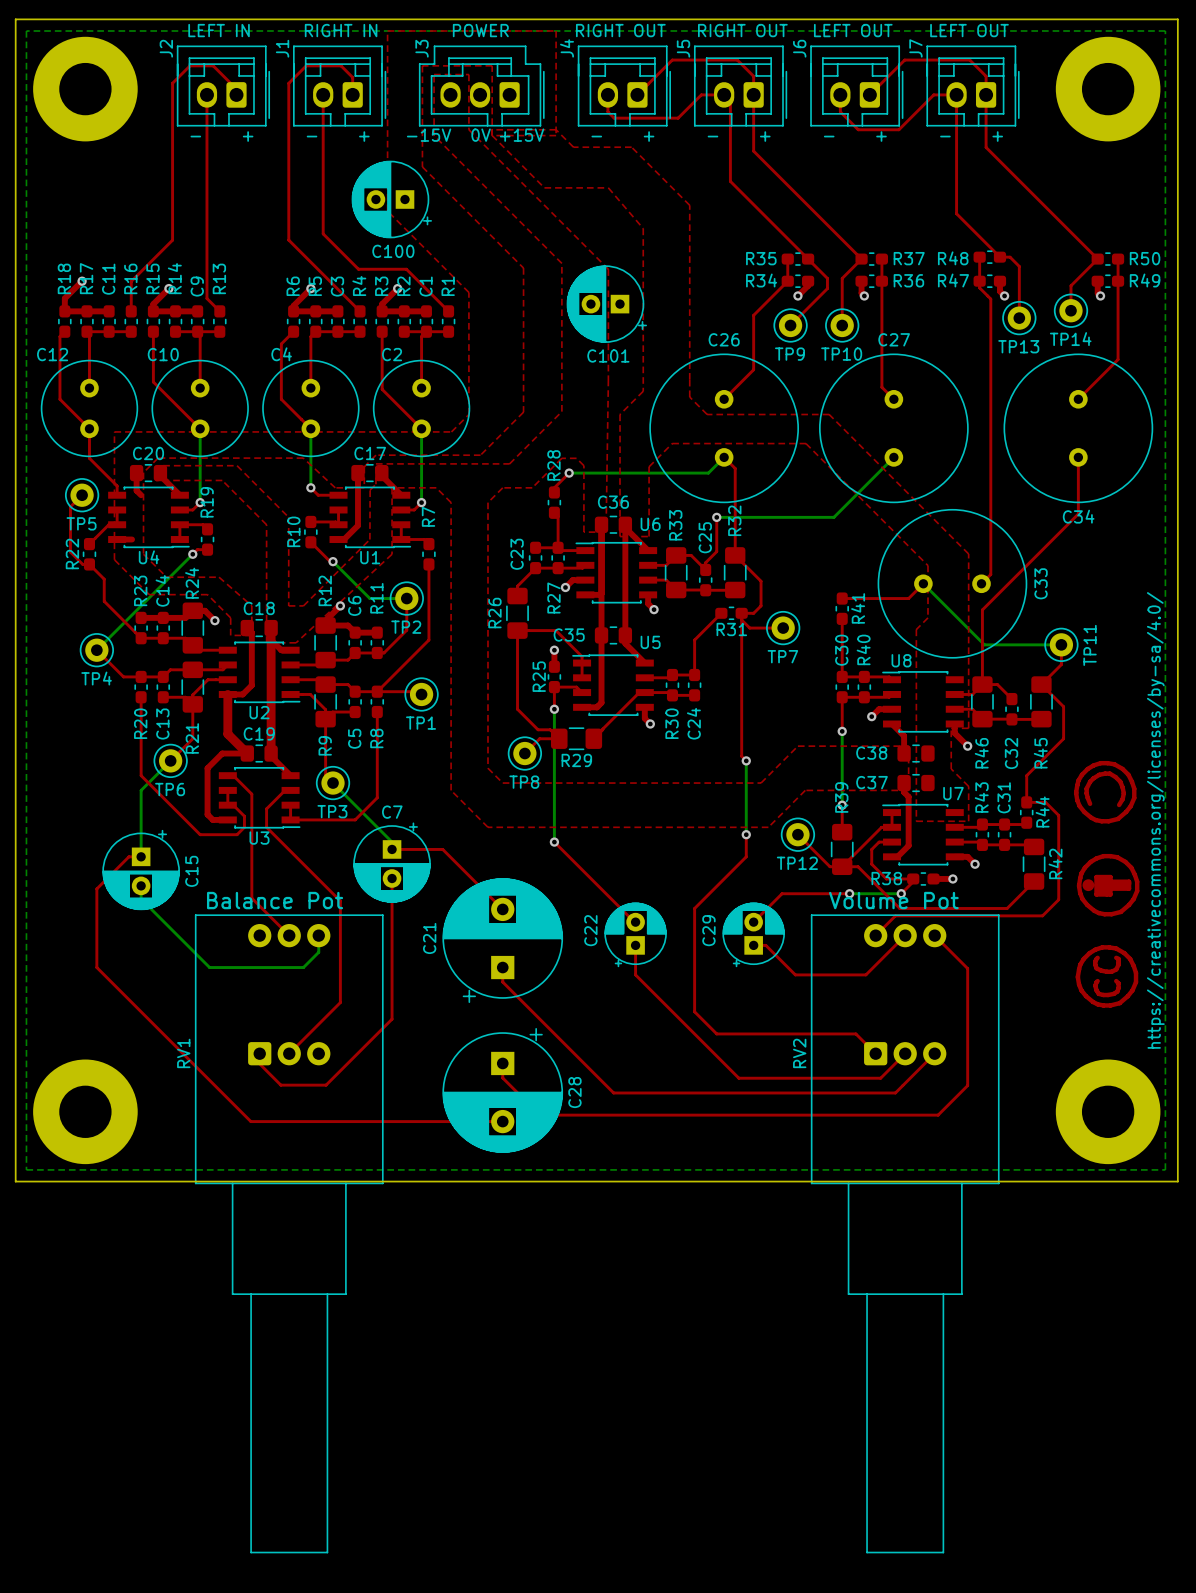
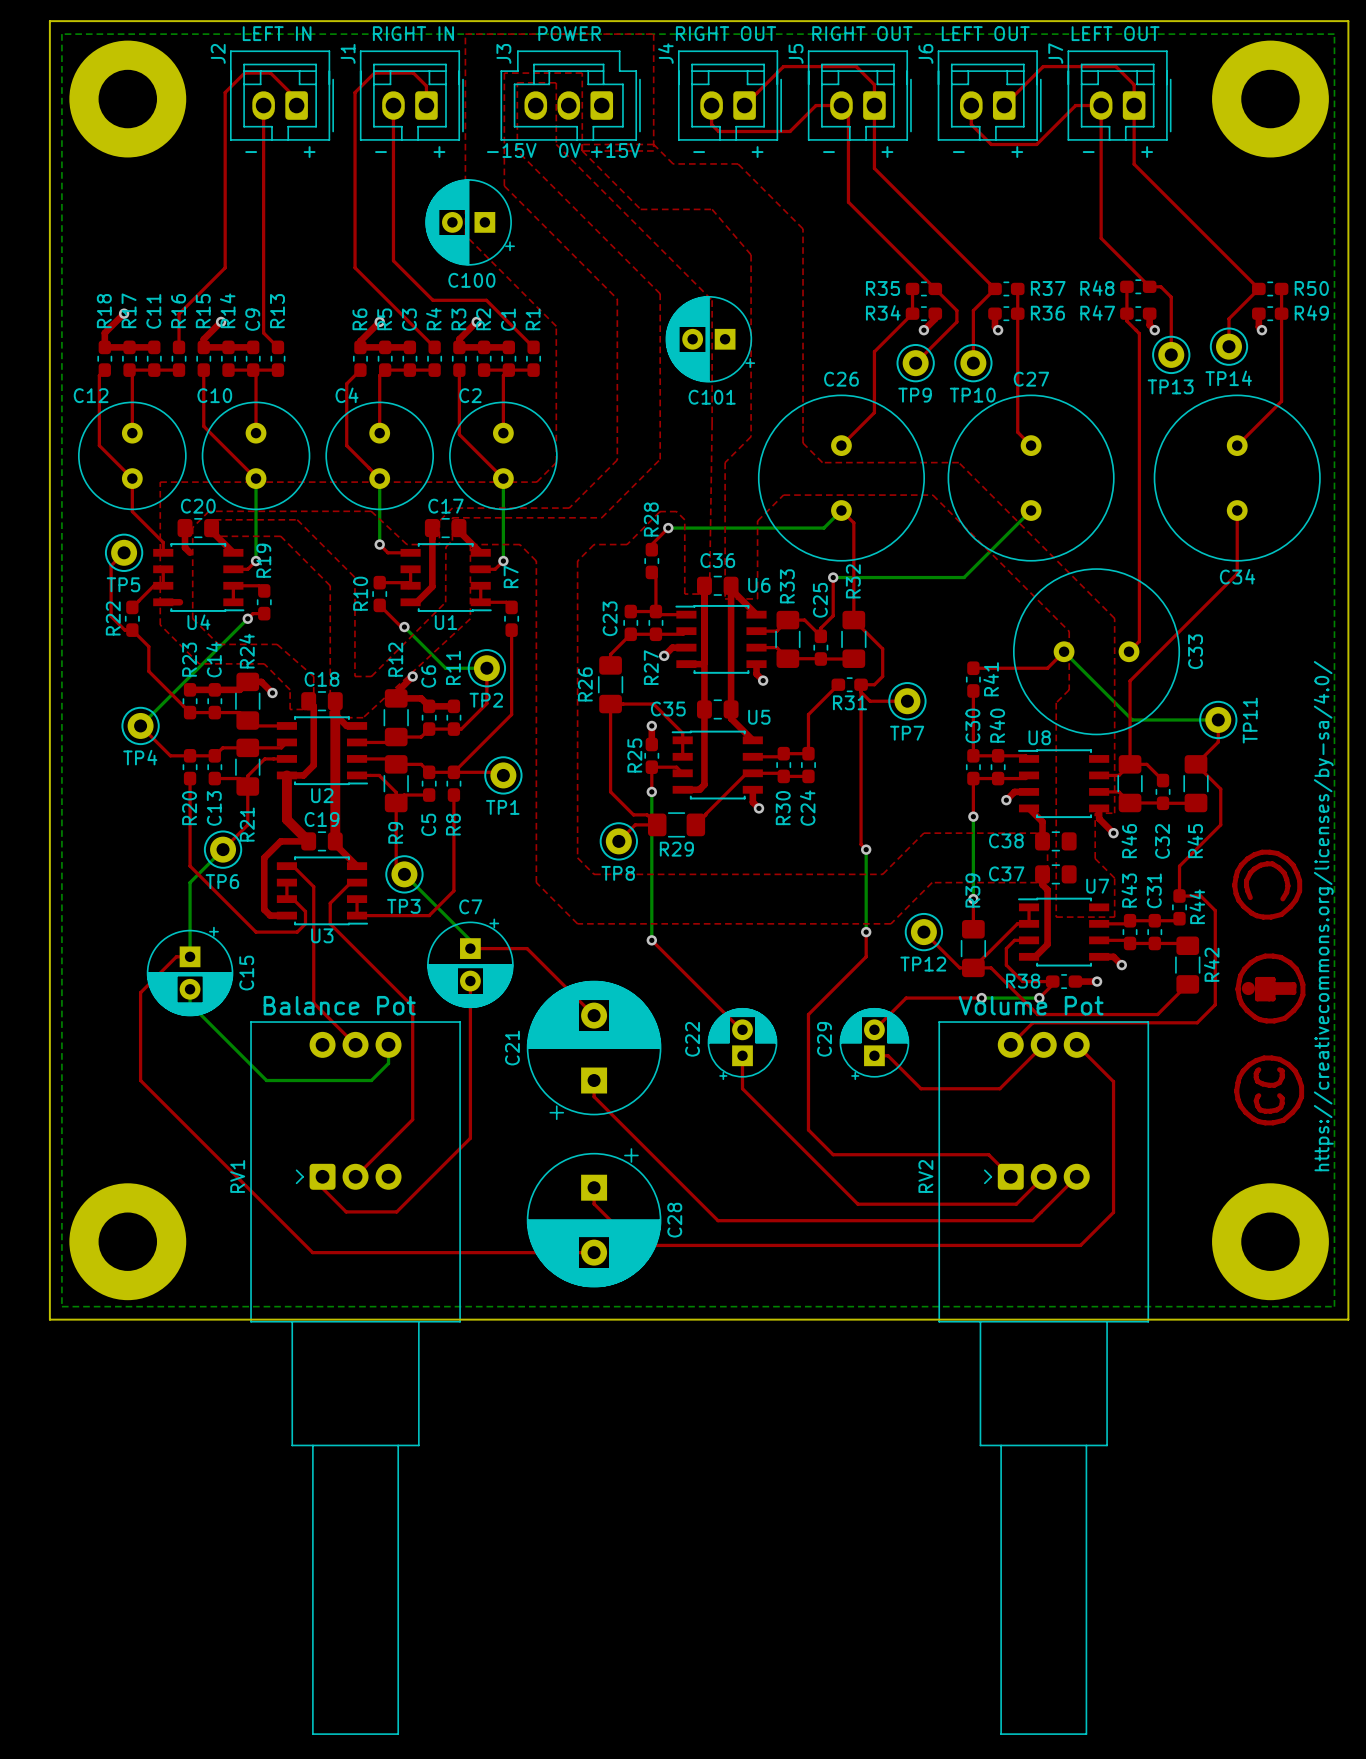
RV1 footprint: [195, 914, 384, 1554] -> [250, 1021, 461, 1735]
RV2 footprint: [810, 914, 1000, 1554] -> [938, 1021, 1150, 1735]

